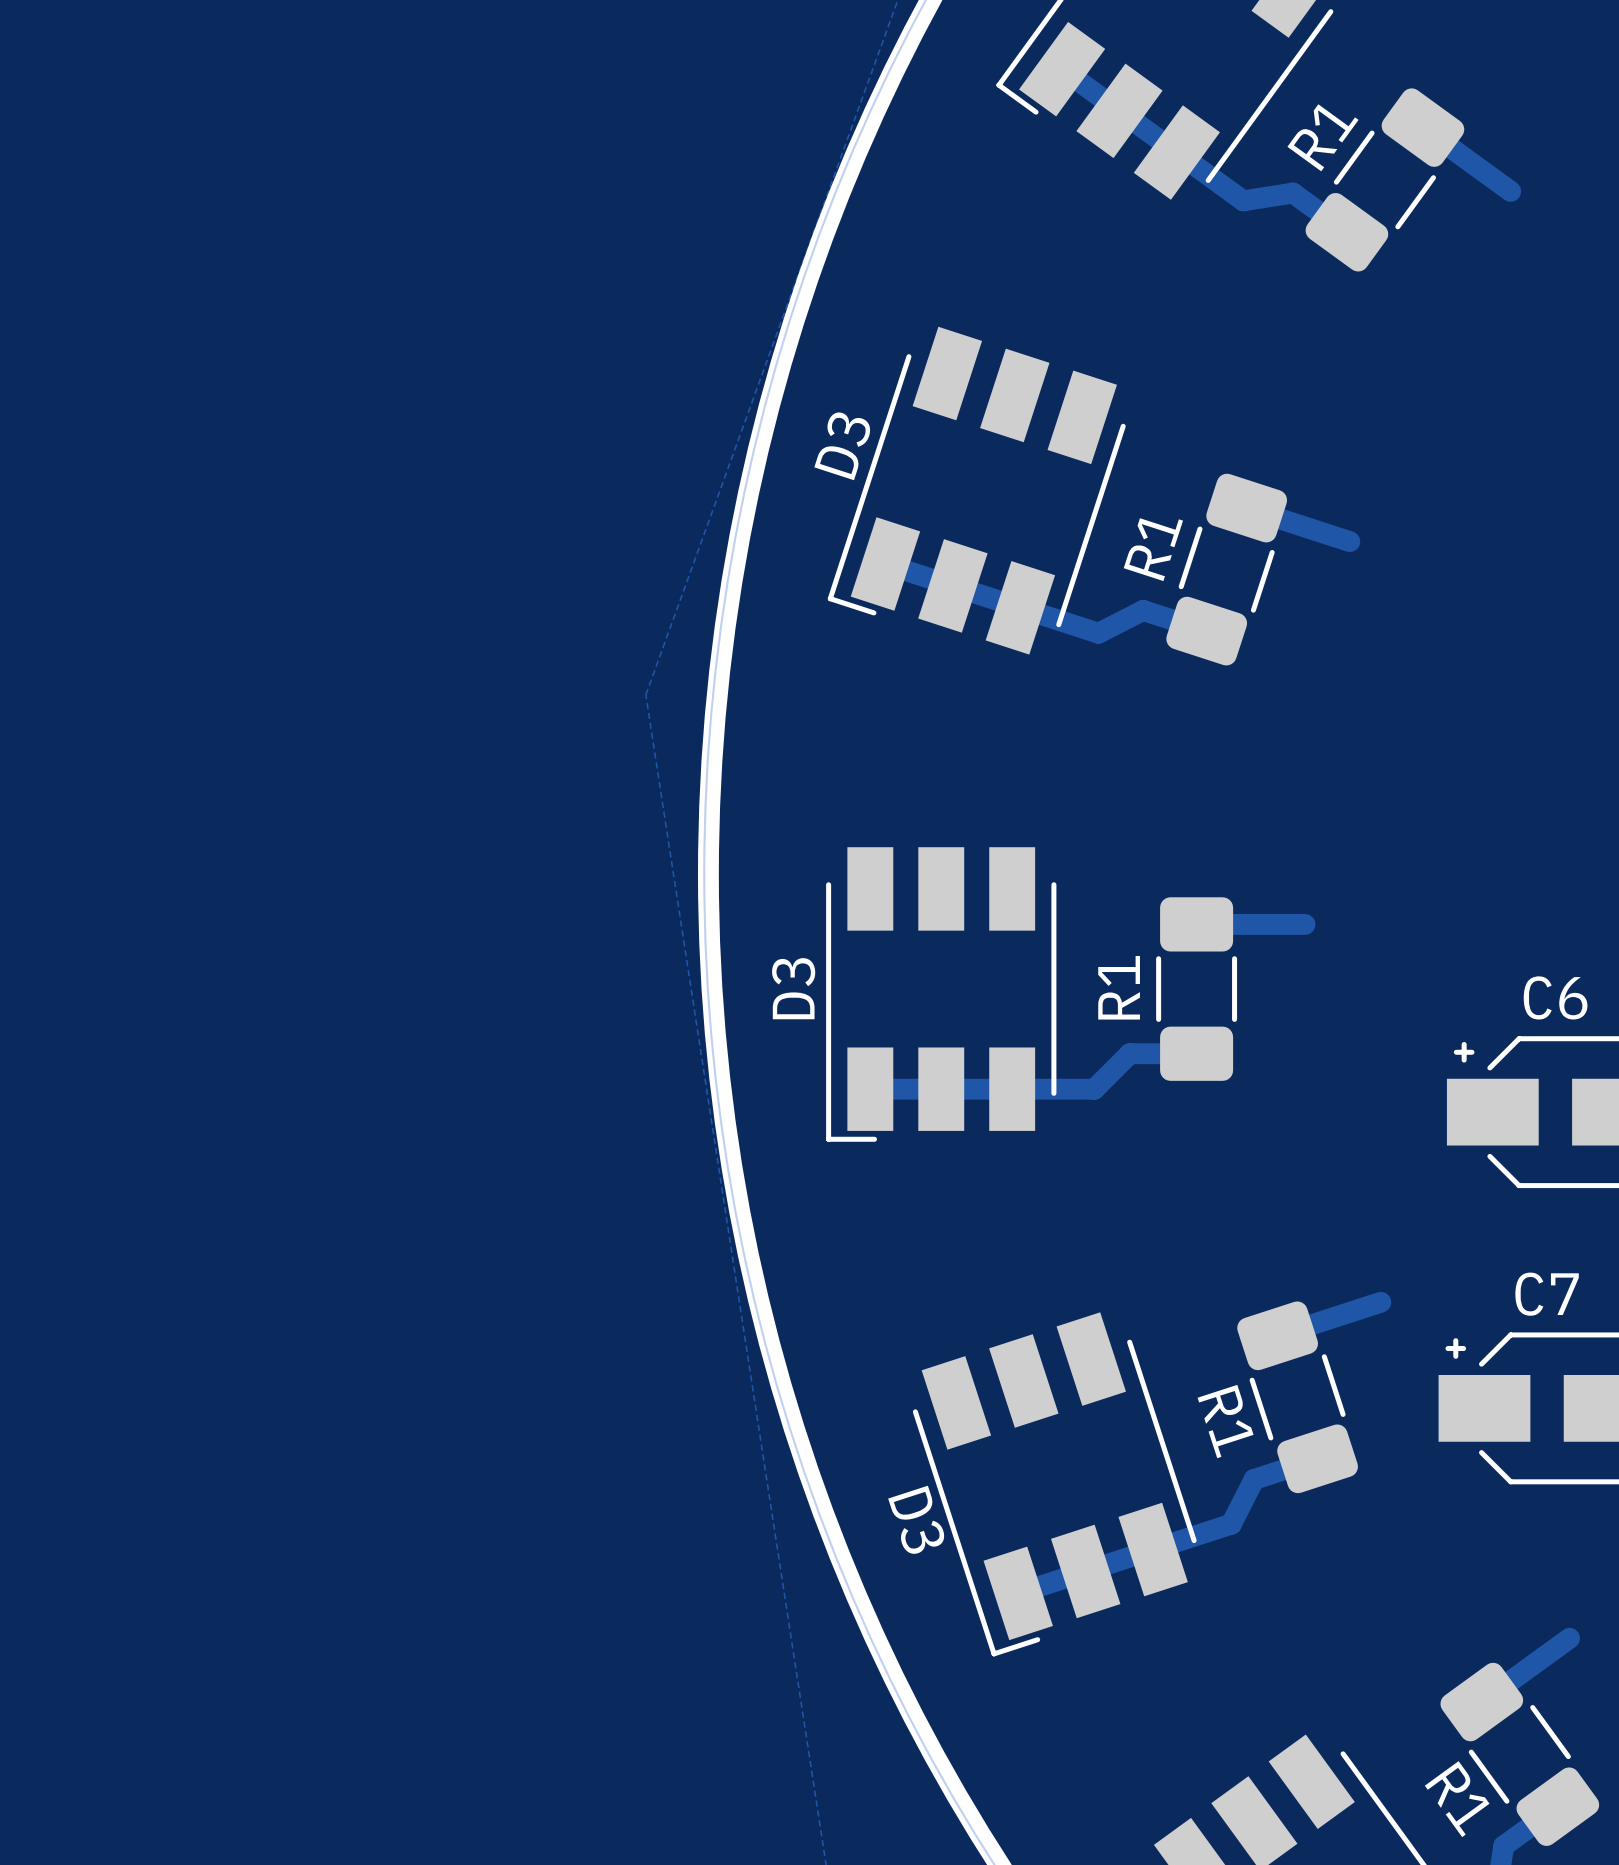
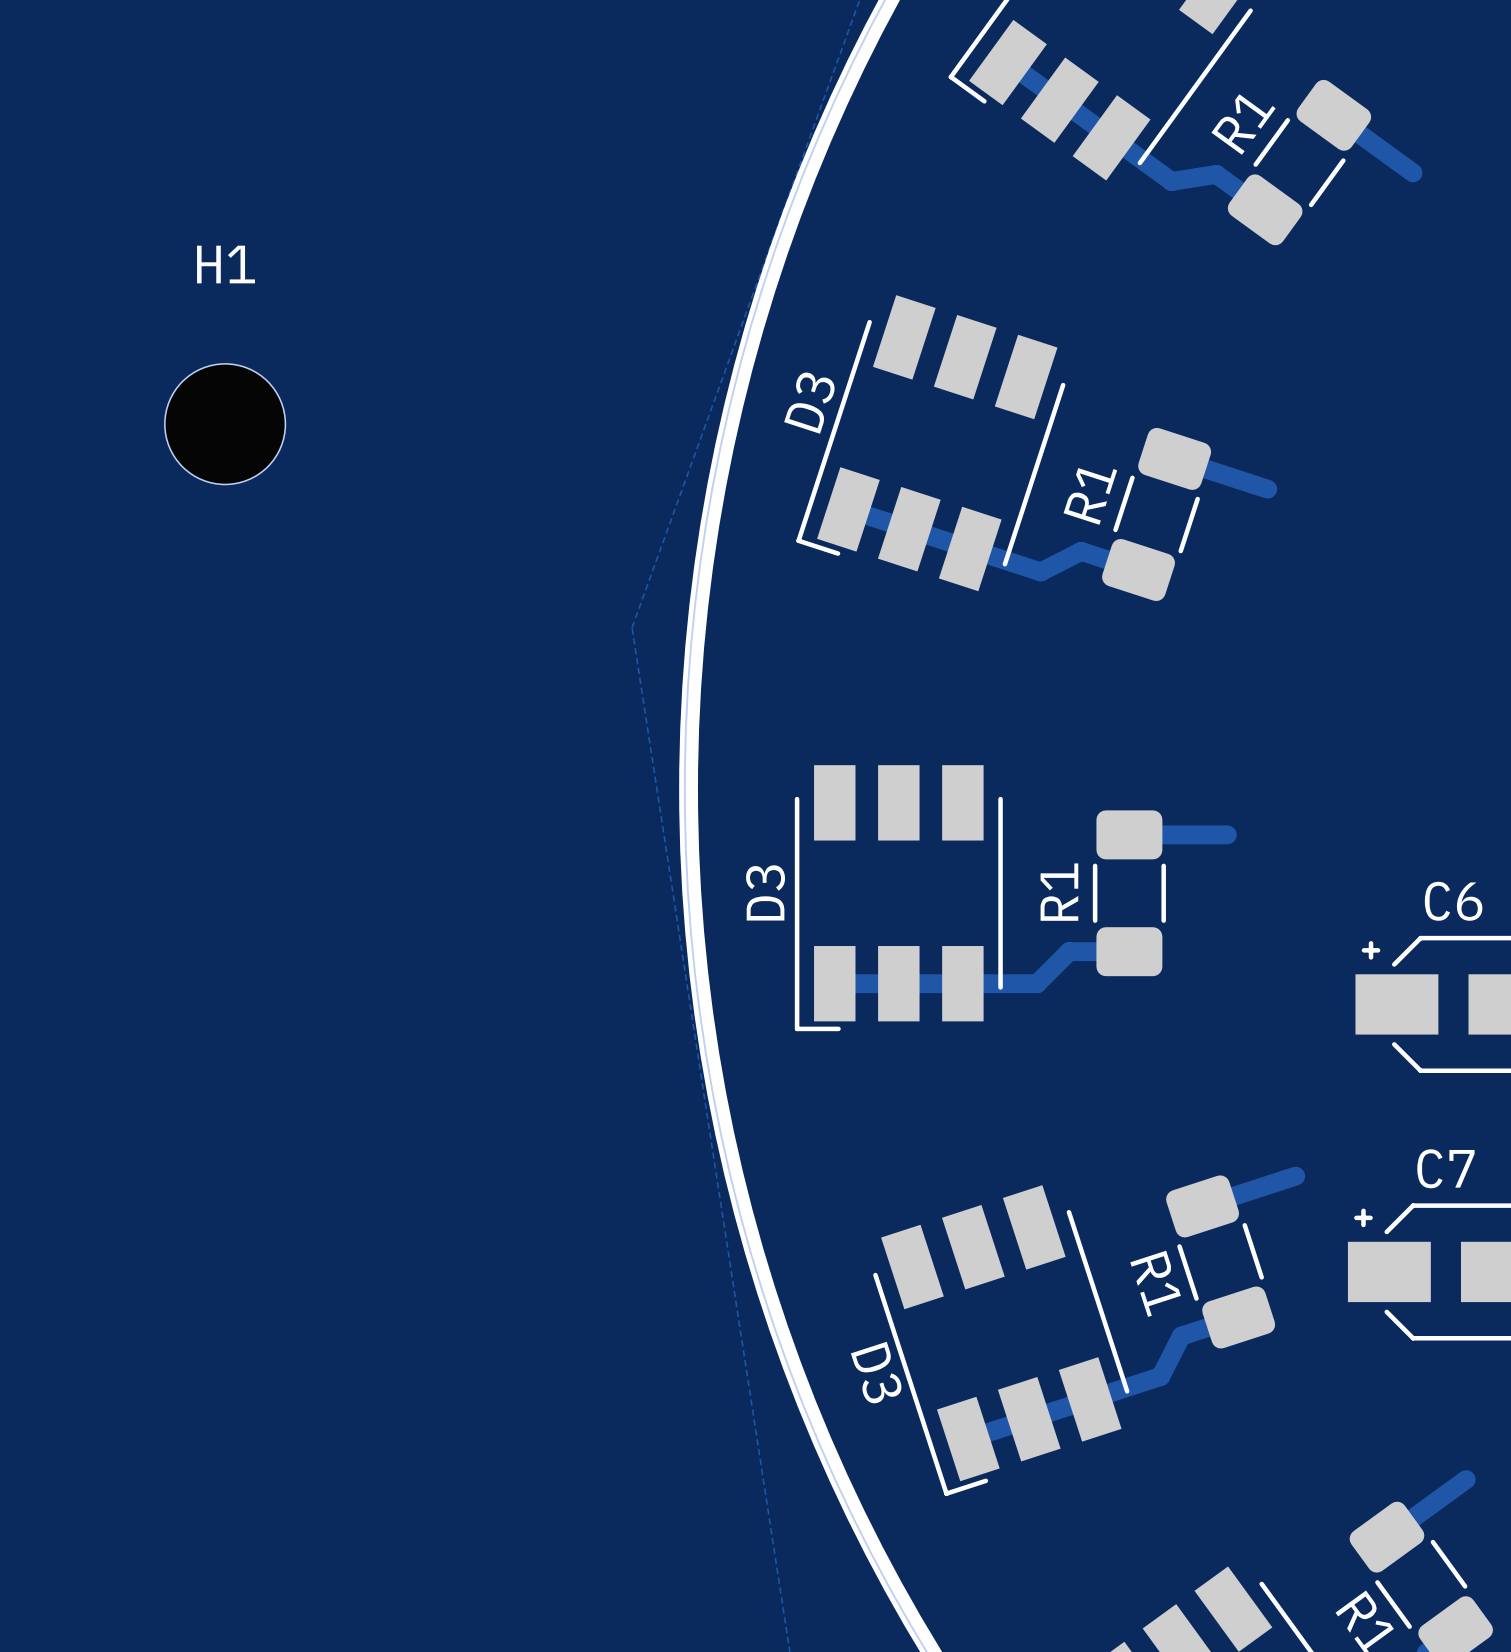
H1: none -> (225, 424)

